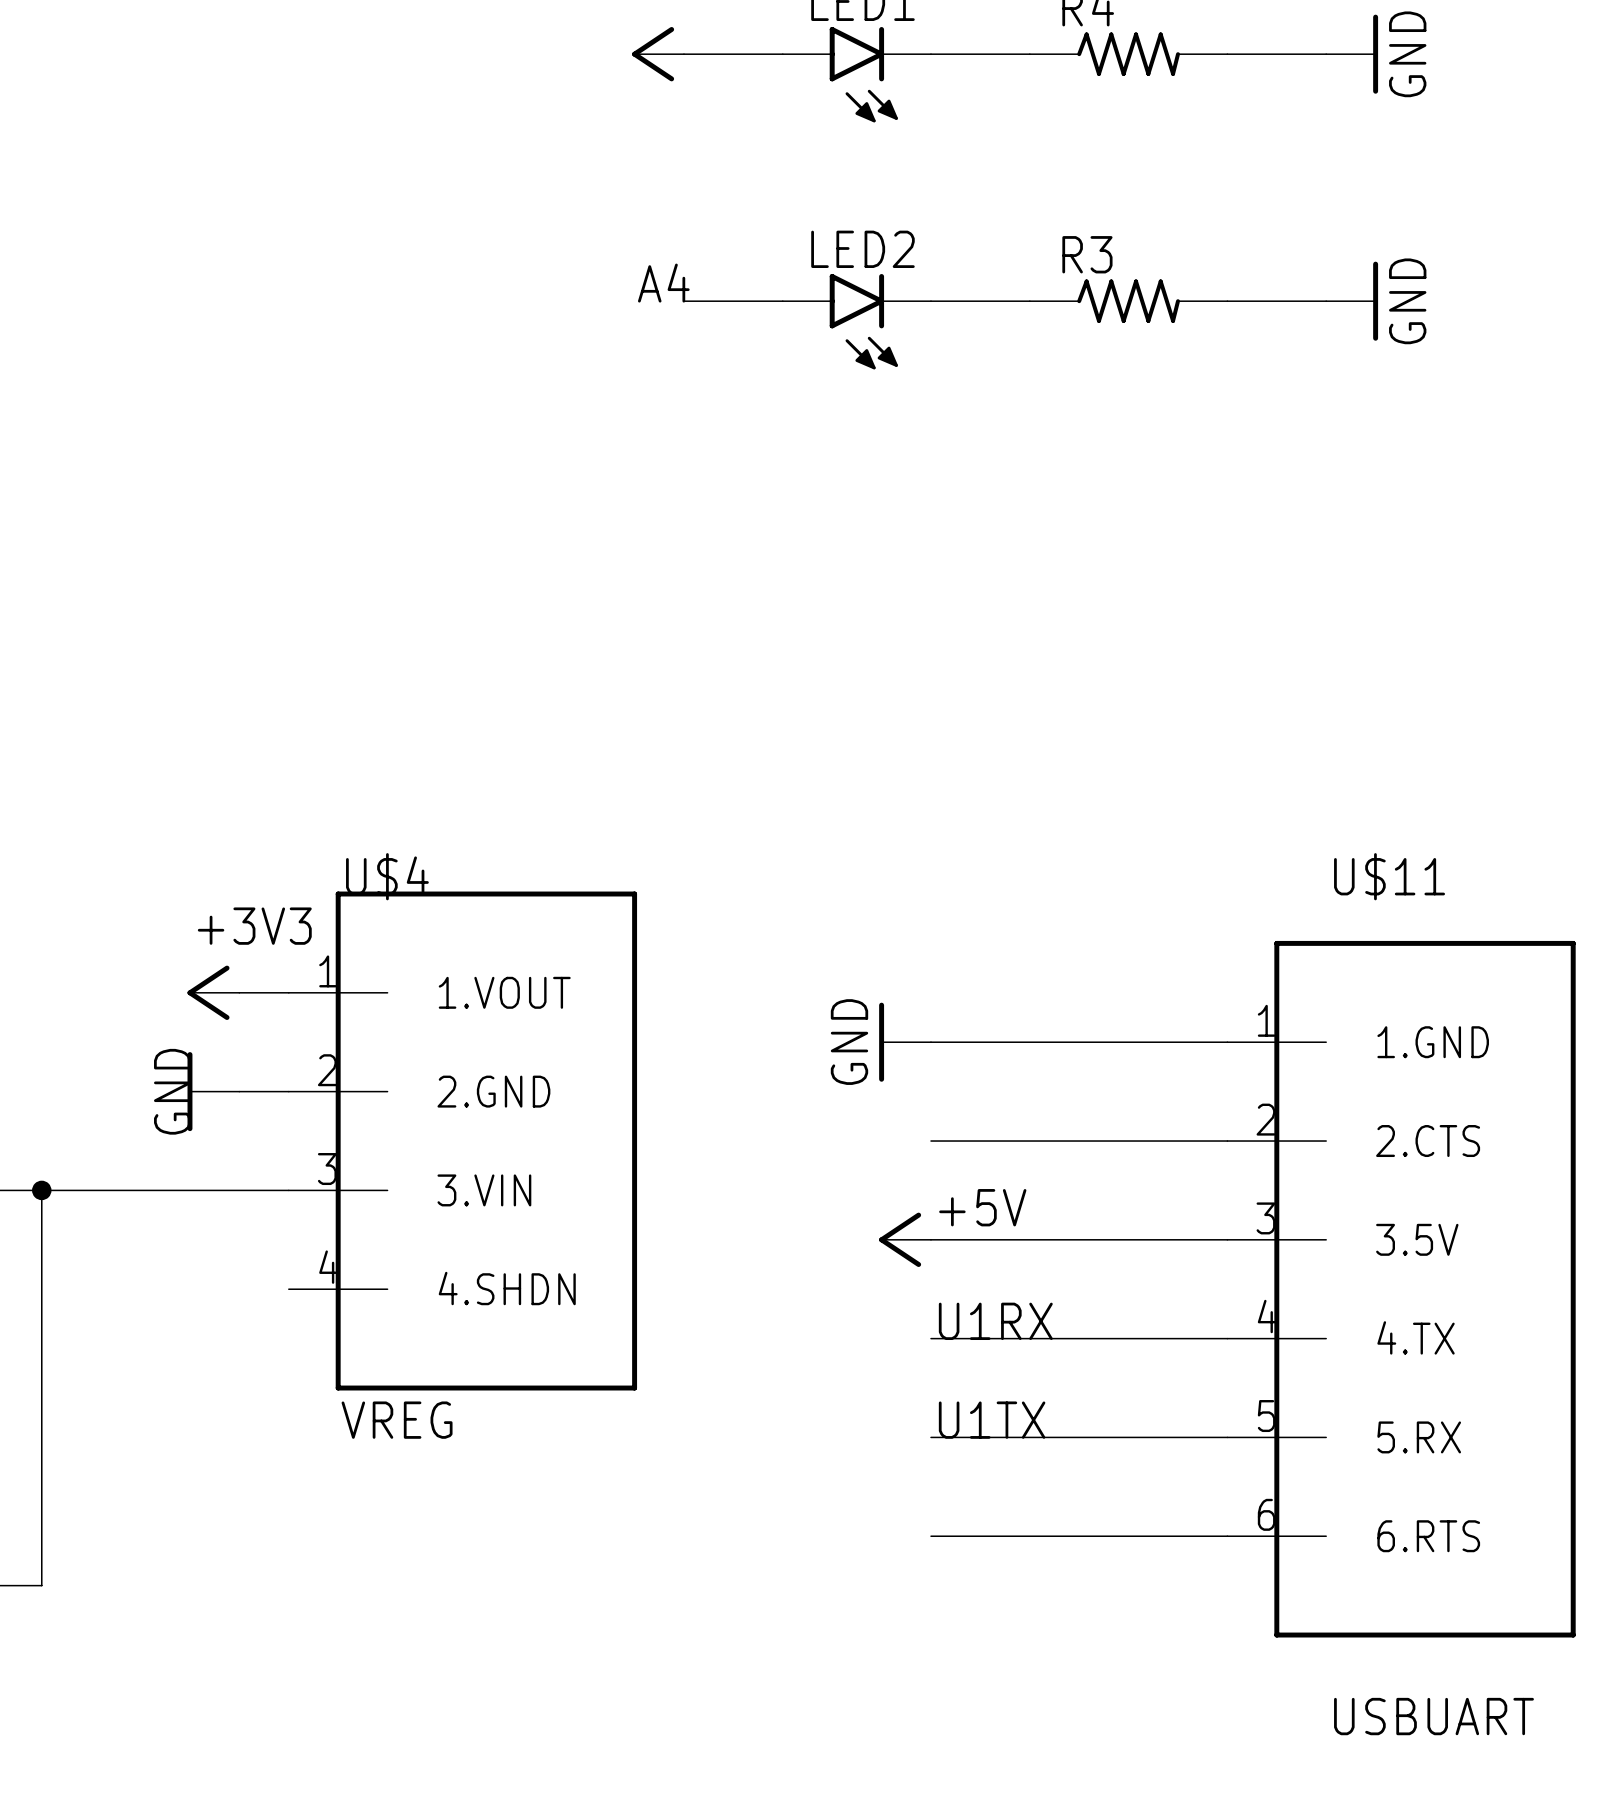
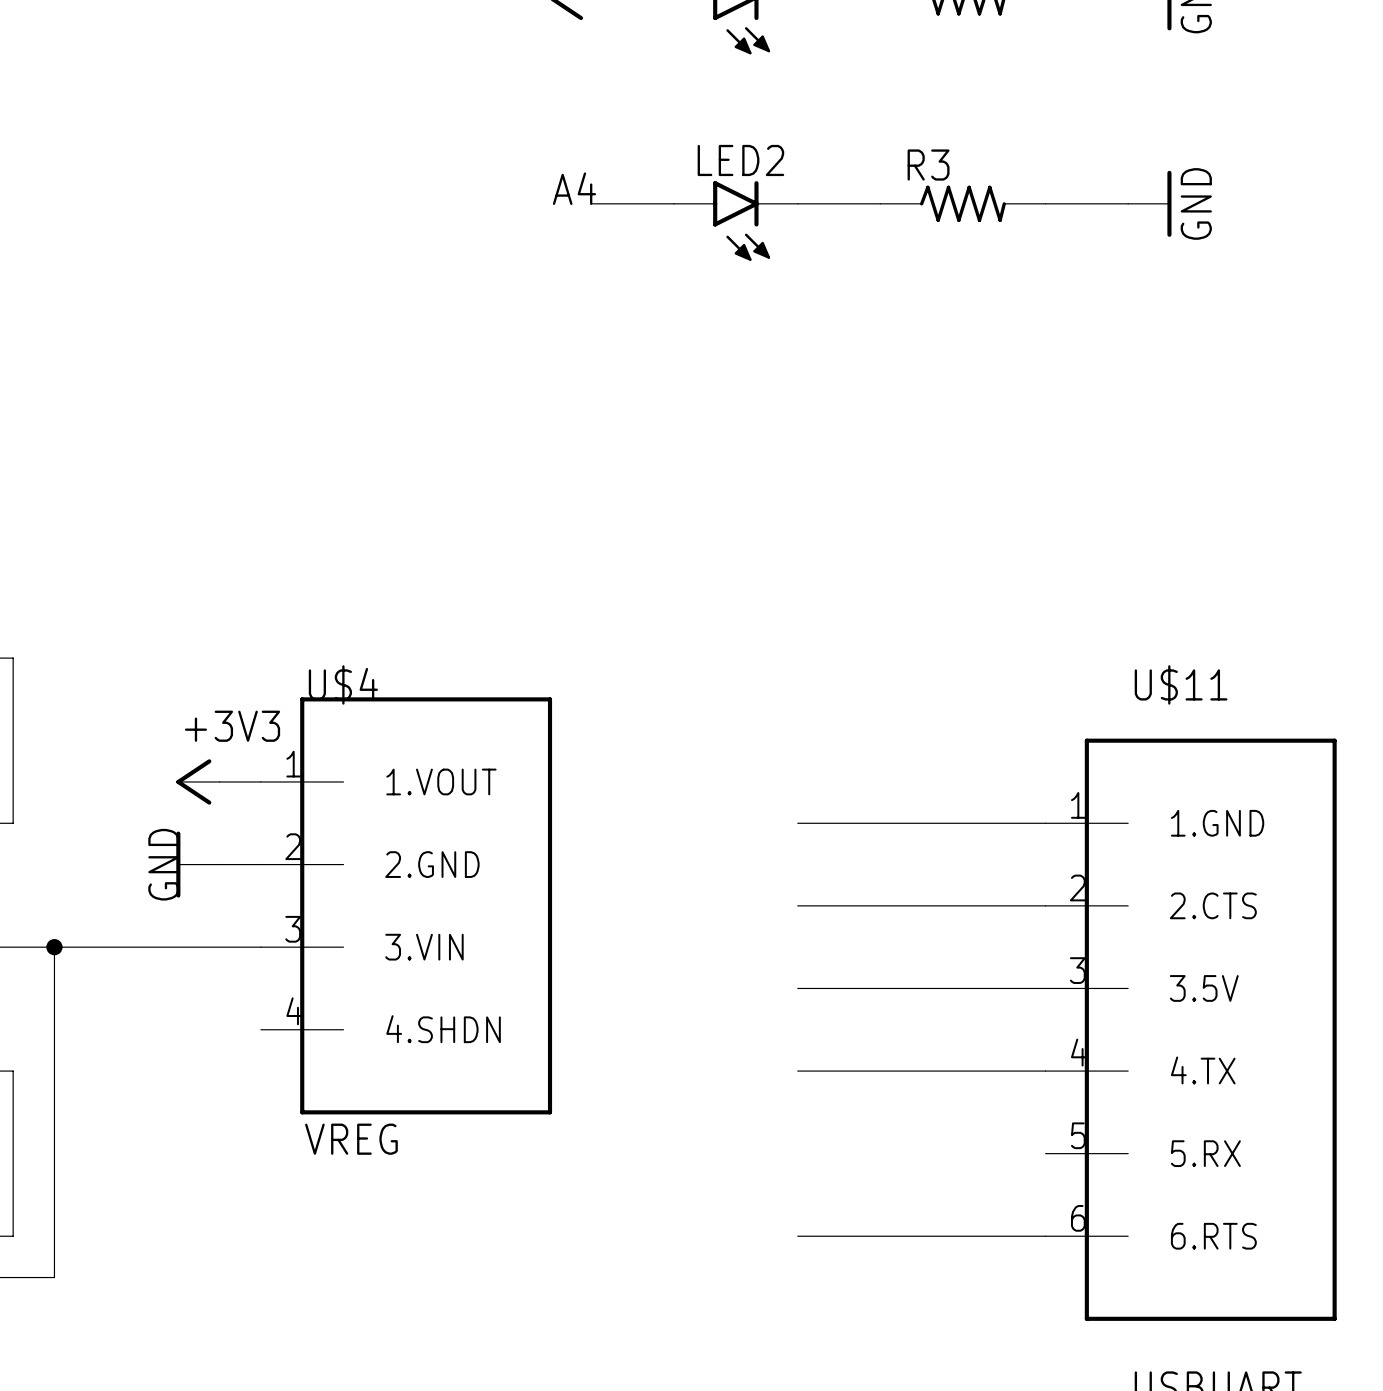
power symbol: GND (905, 1042) -> none
power symbol: +5V (905, 1239) -> none
label: U1RX (995, 1321) -> none
label: U1TX (992, 1420) -> none
wire: (931, 1437) (1227, 1437) -> none

